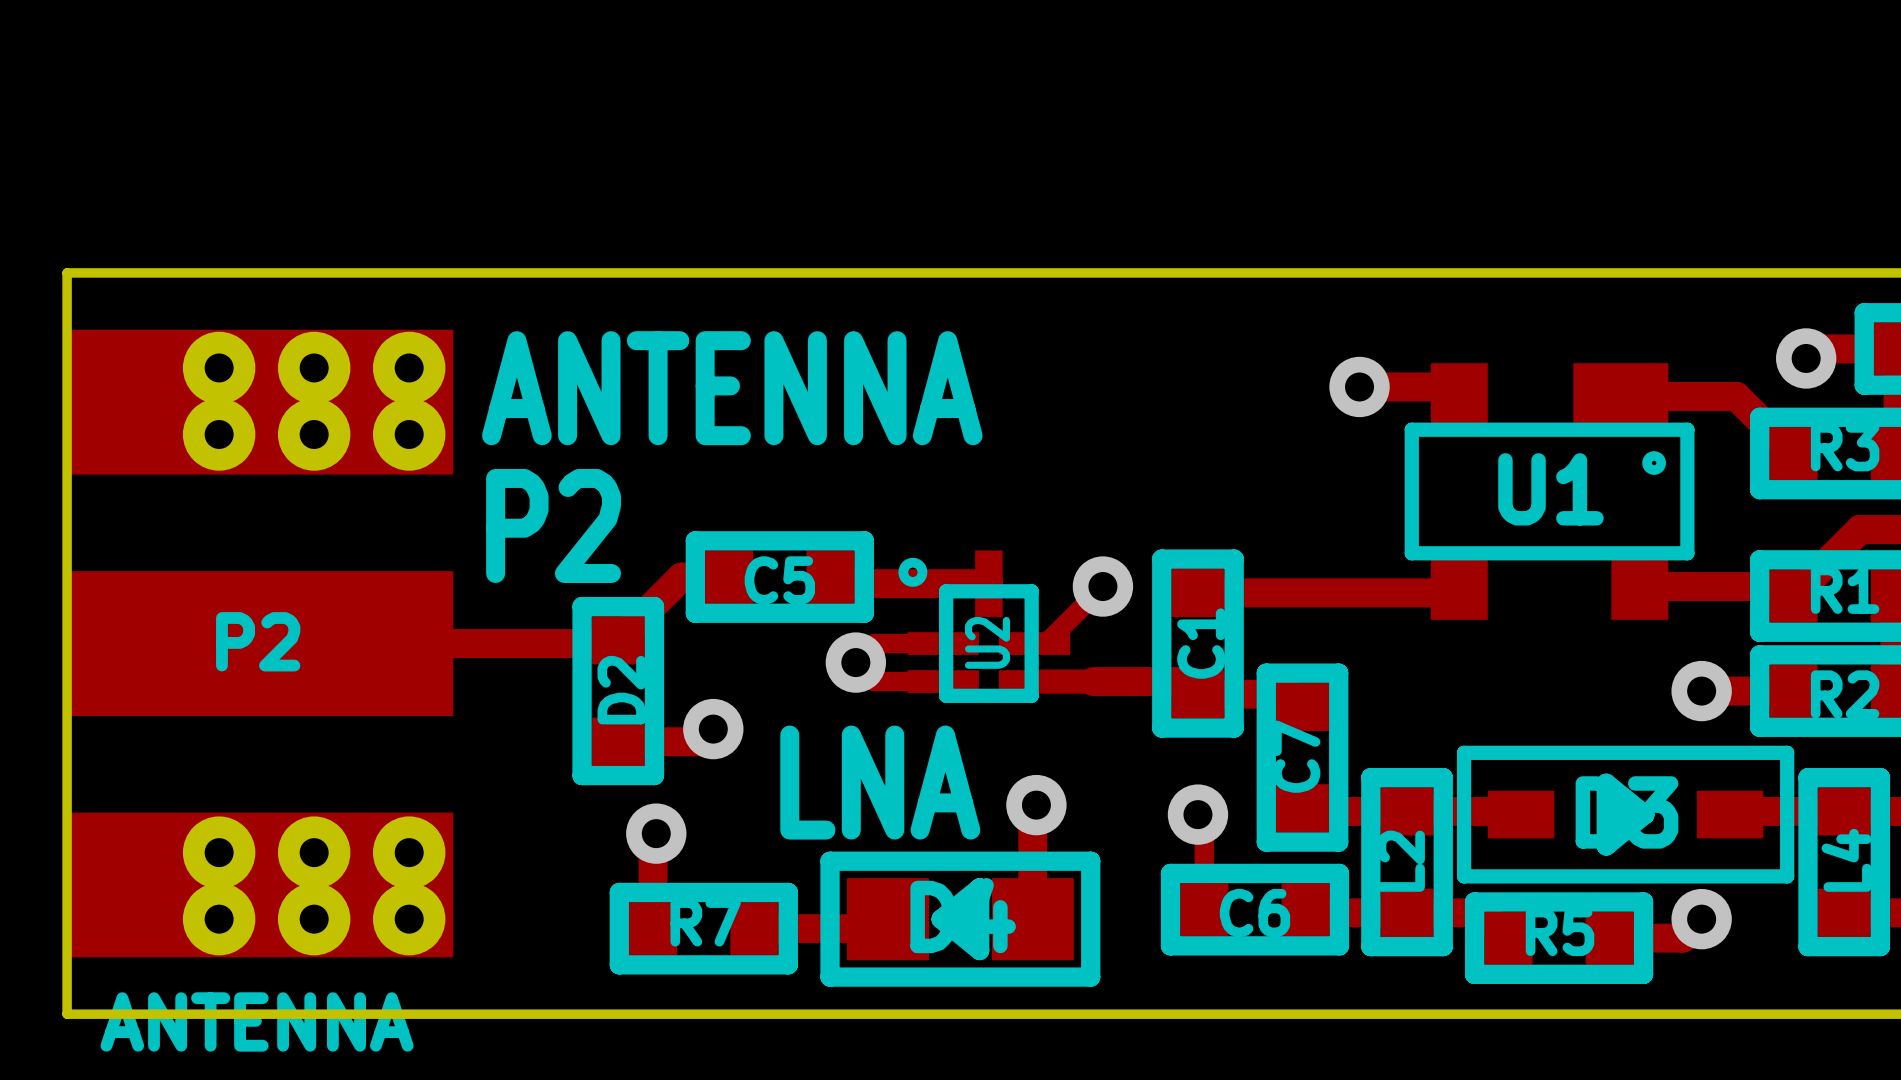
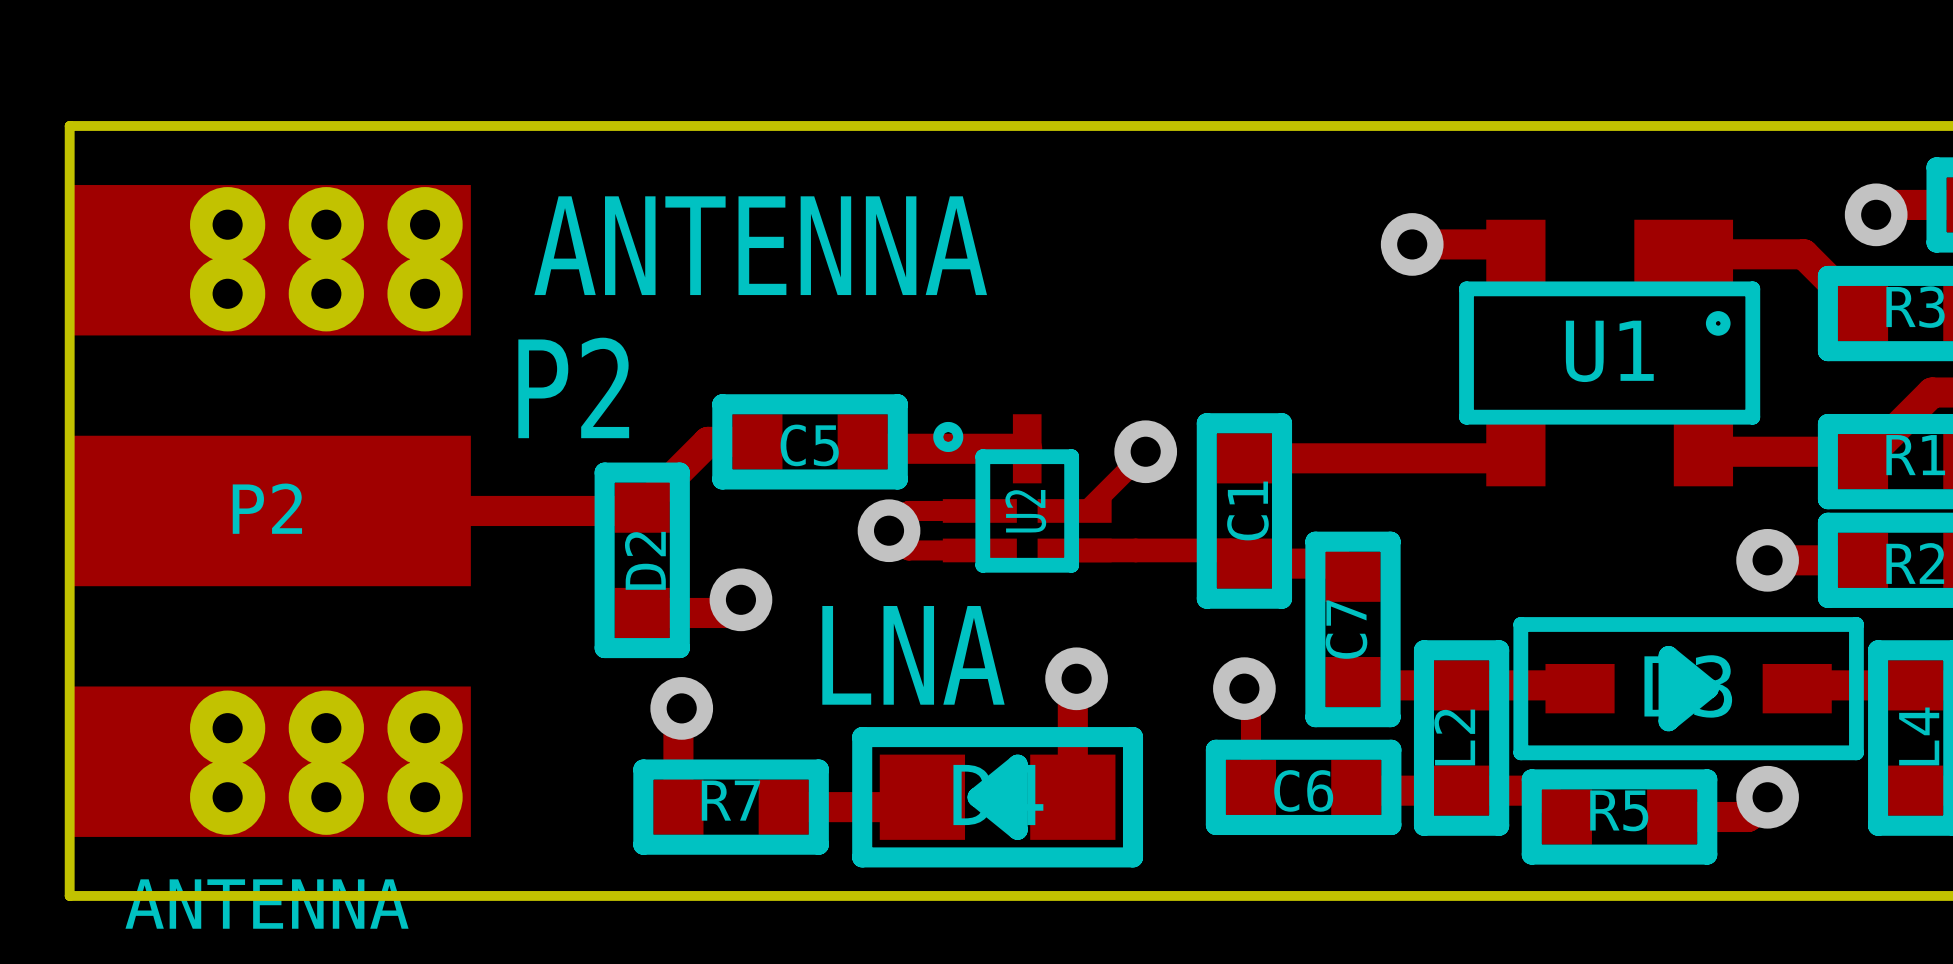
track width: thick (1034, 681) (1185, 681) (1197, 694) -> thin (1074, 550) (1231, 550) (1244, 563)

